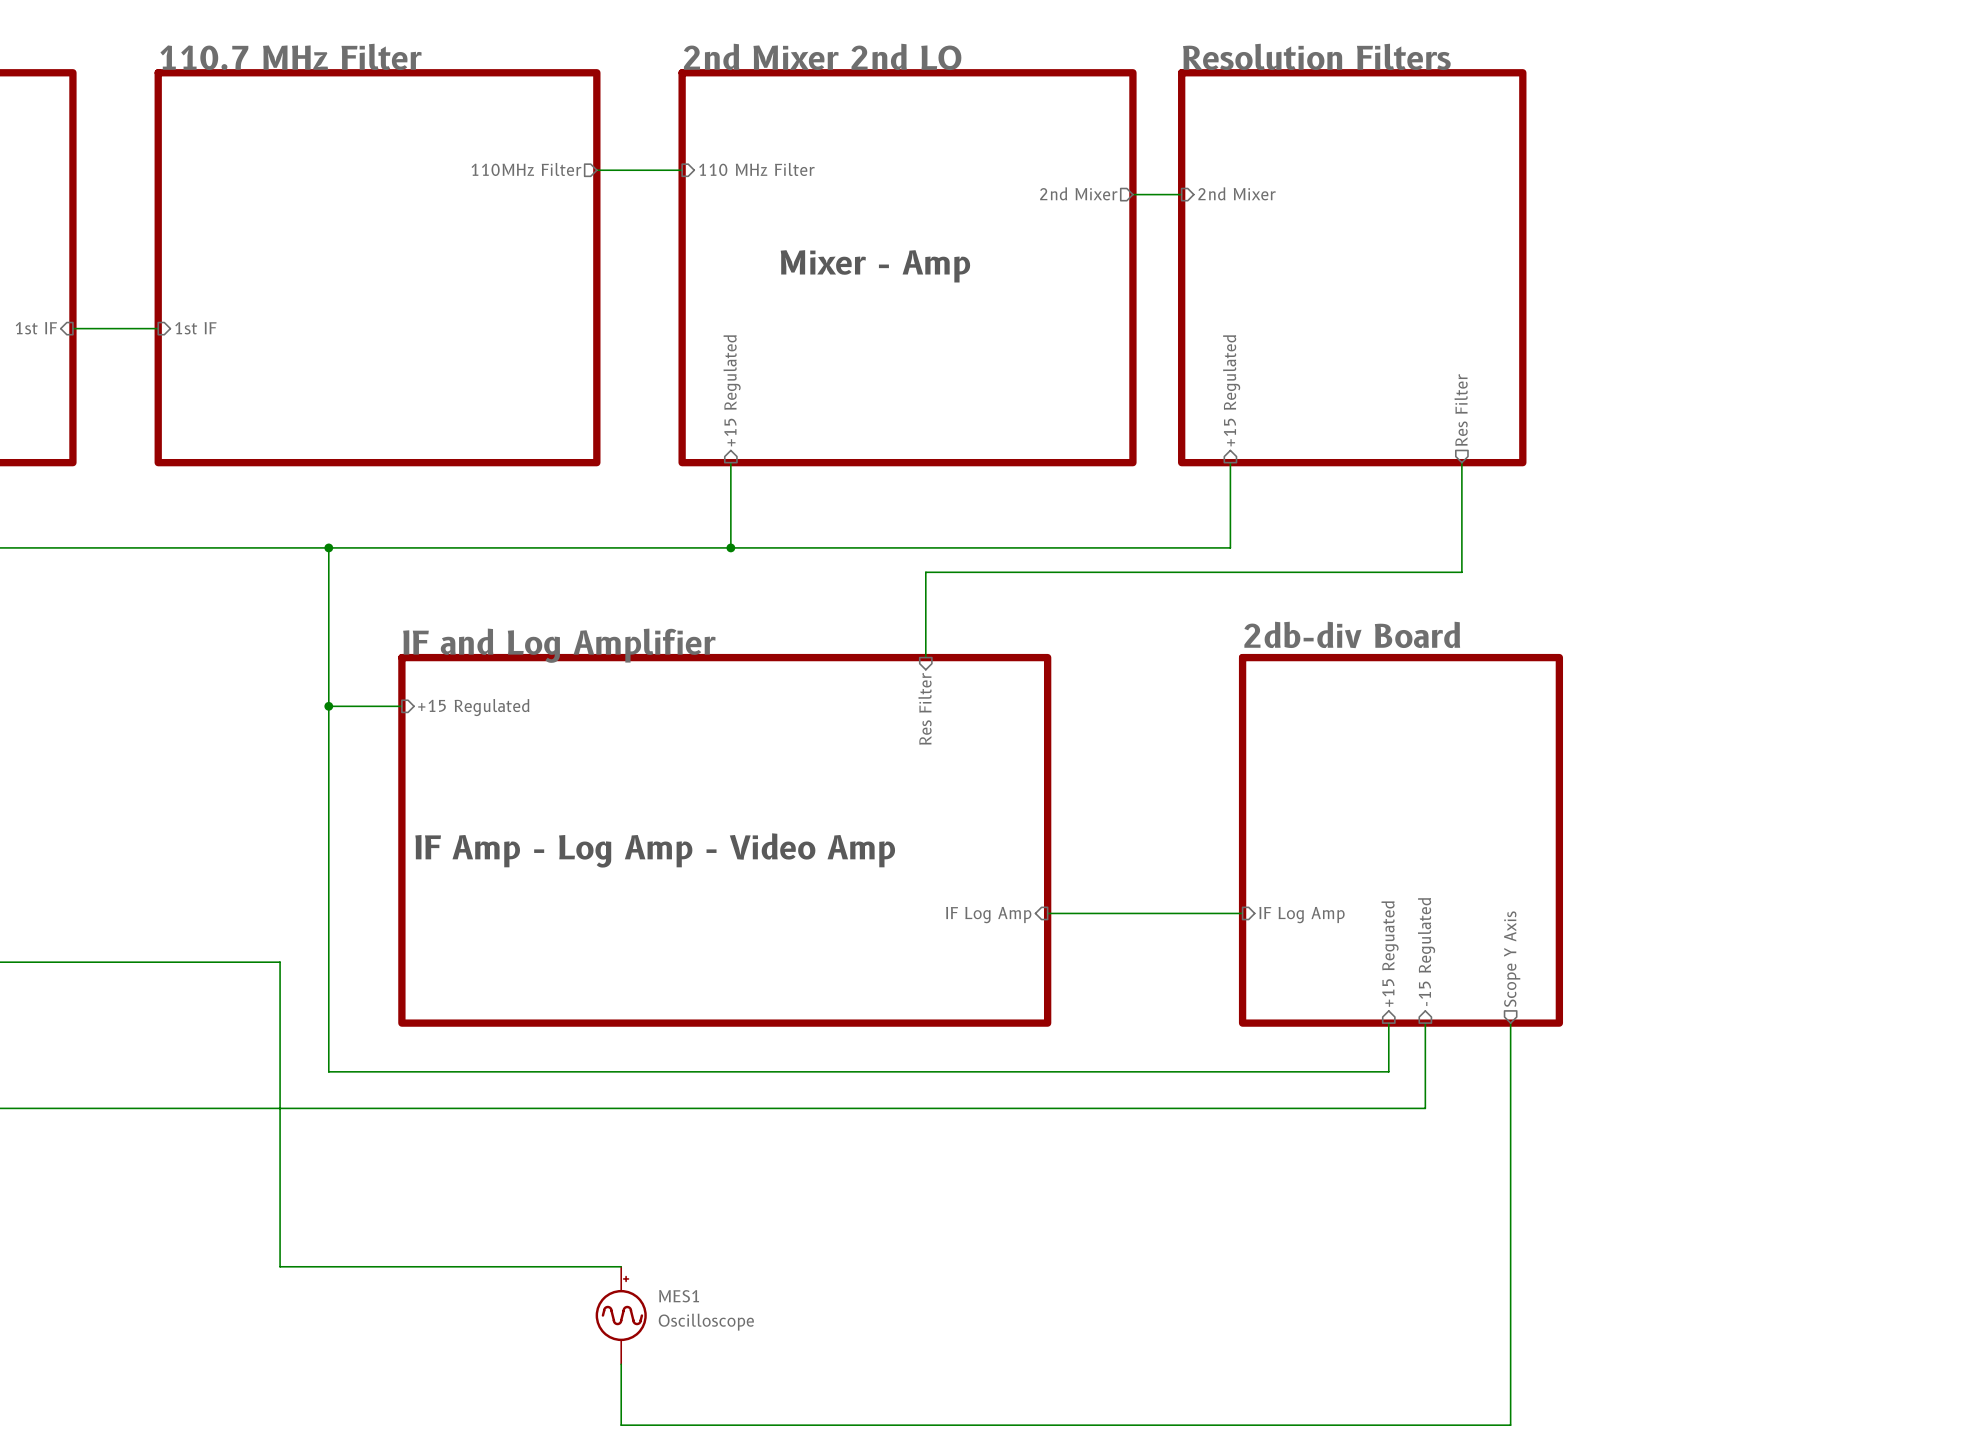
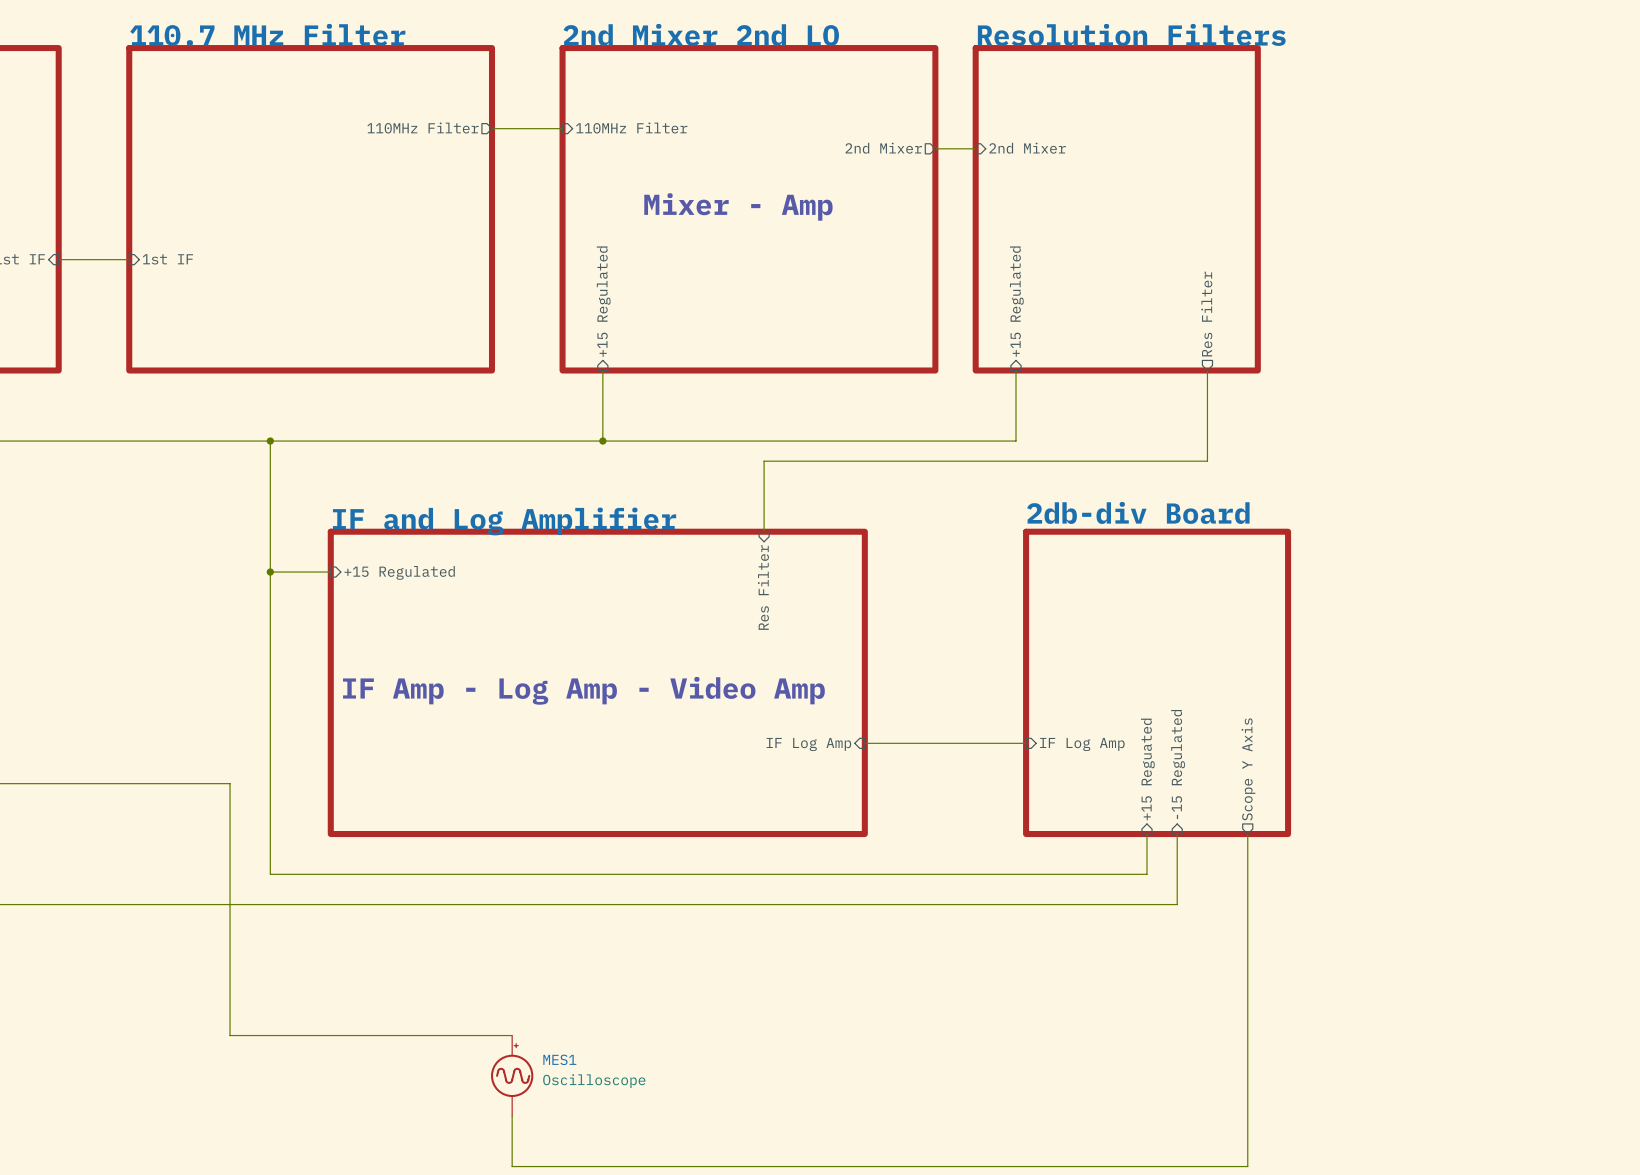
sheet pin: 110 MHz Filter (756, 169) -> 110MHz Filter (631, 128)

